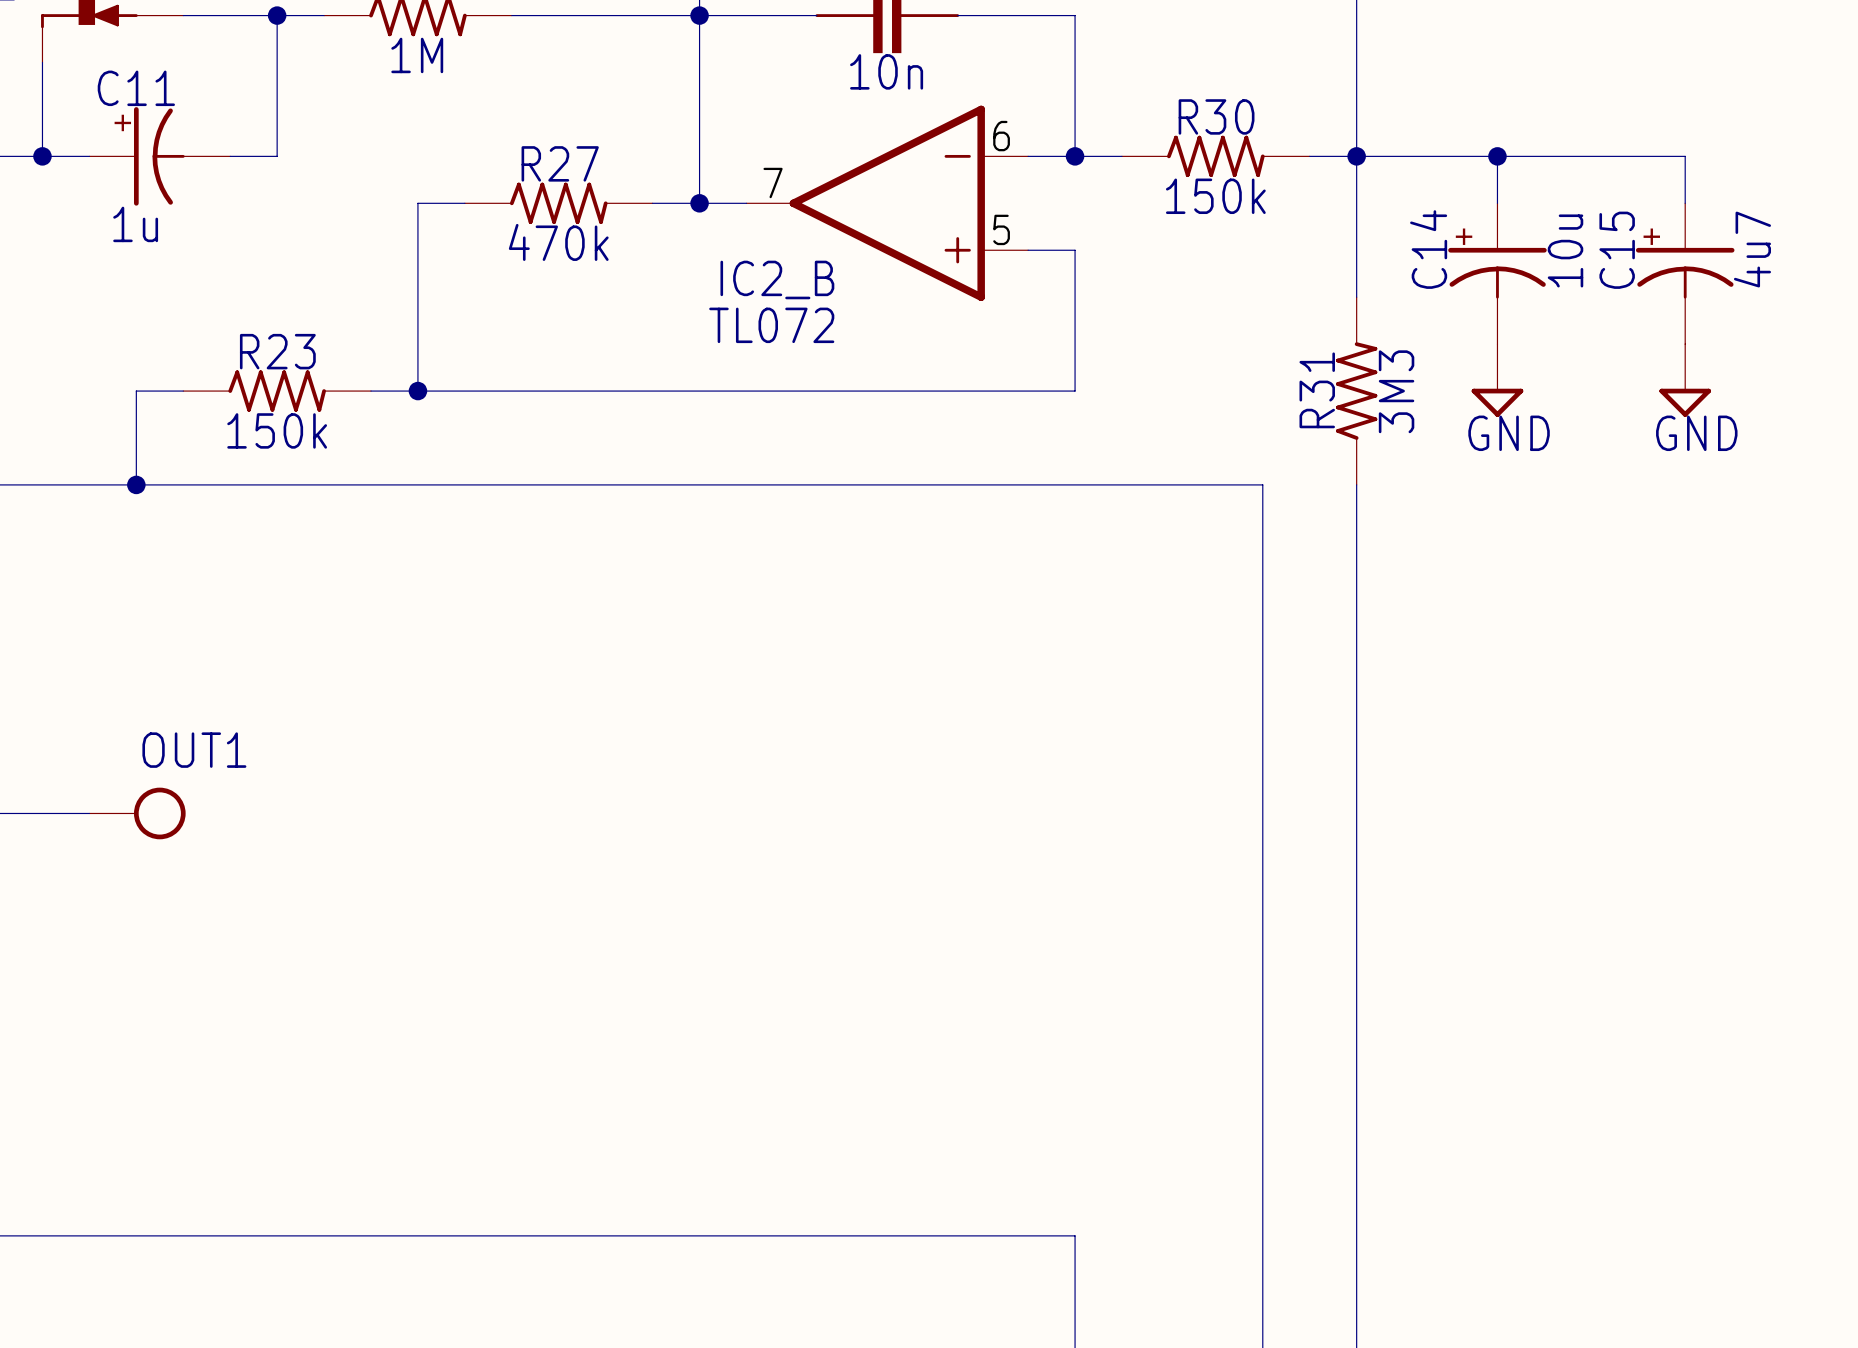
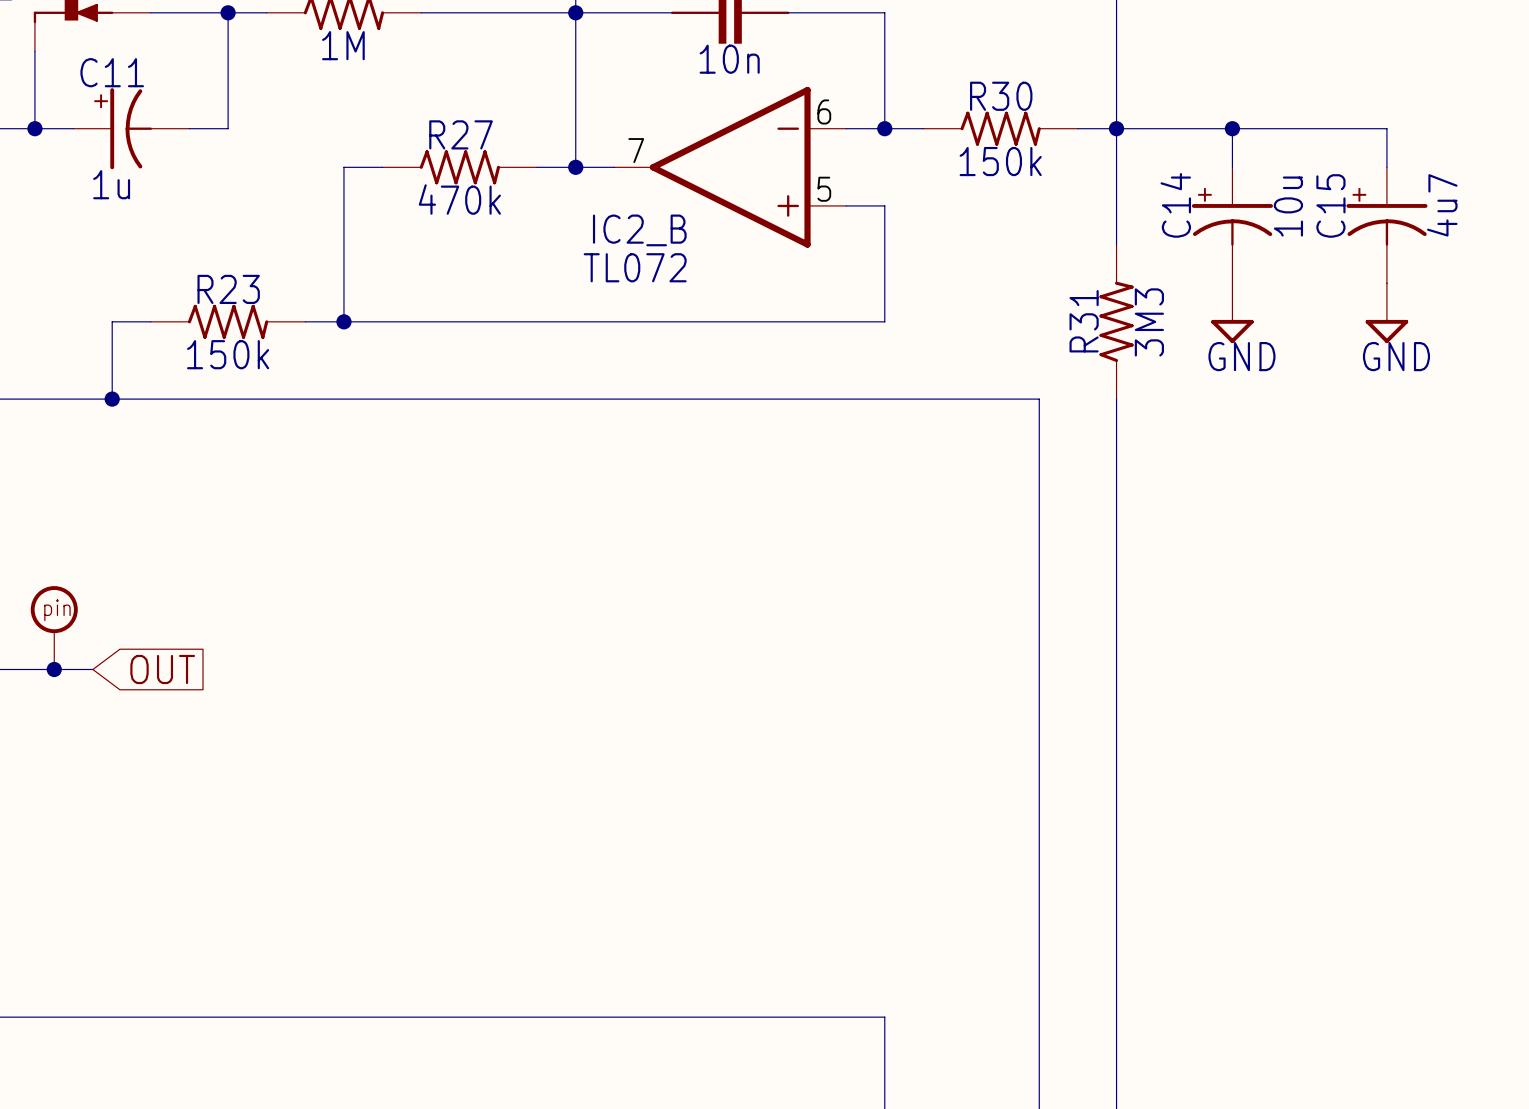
part: none -> (54, 627)
junction: none -> (54, 669)
OUT1: (137, 813) -> none
global label: none -> OUT (162, 669)

